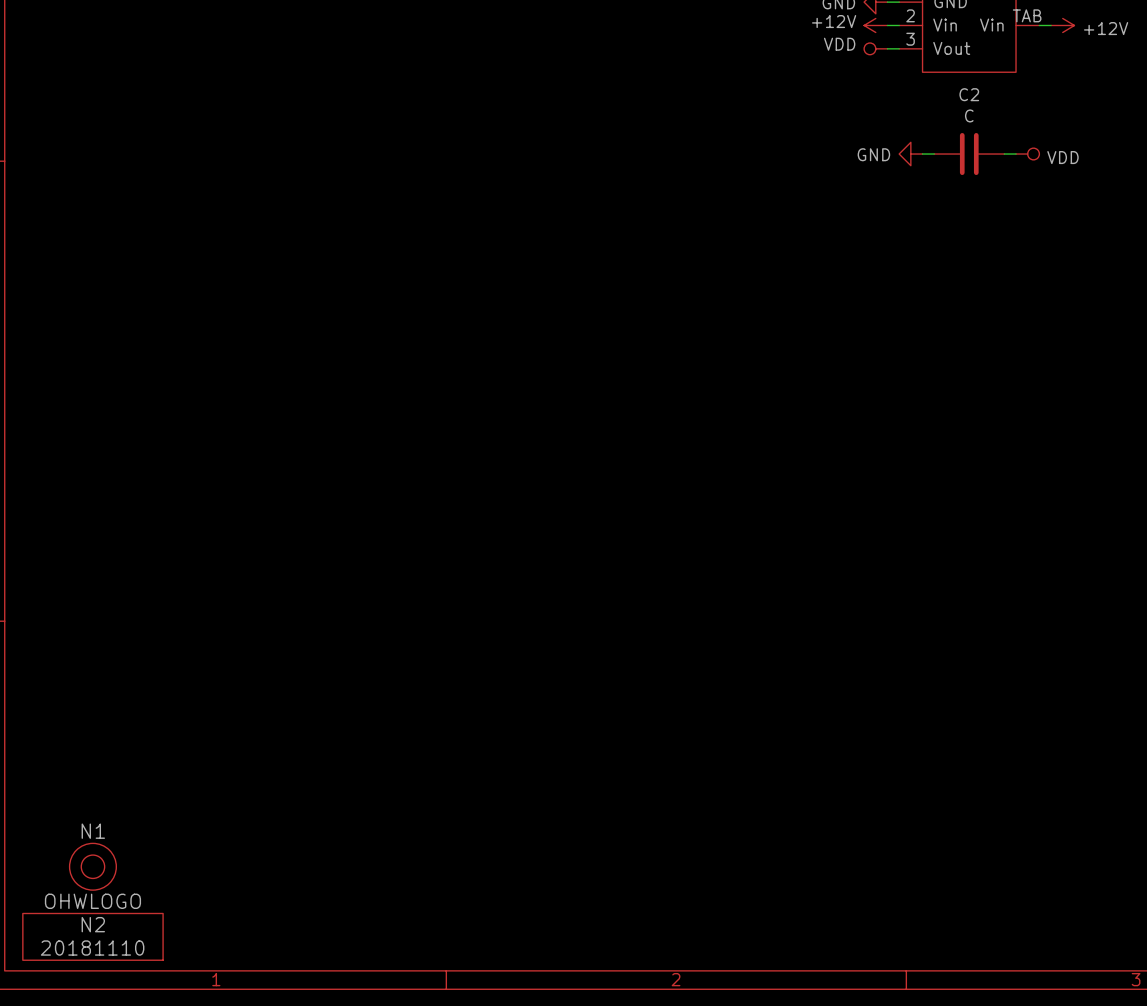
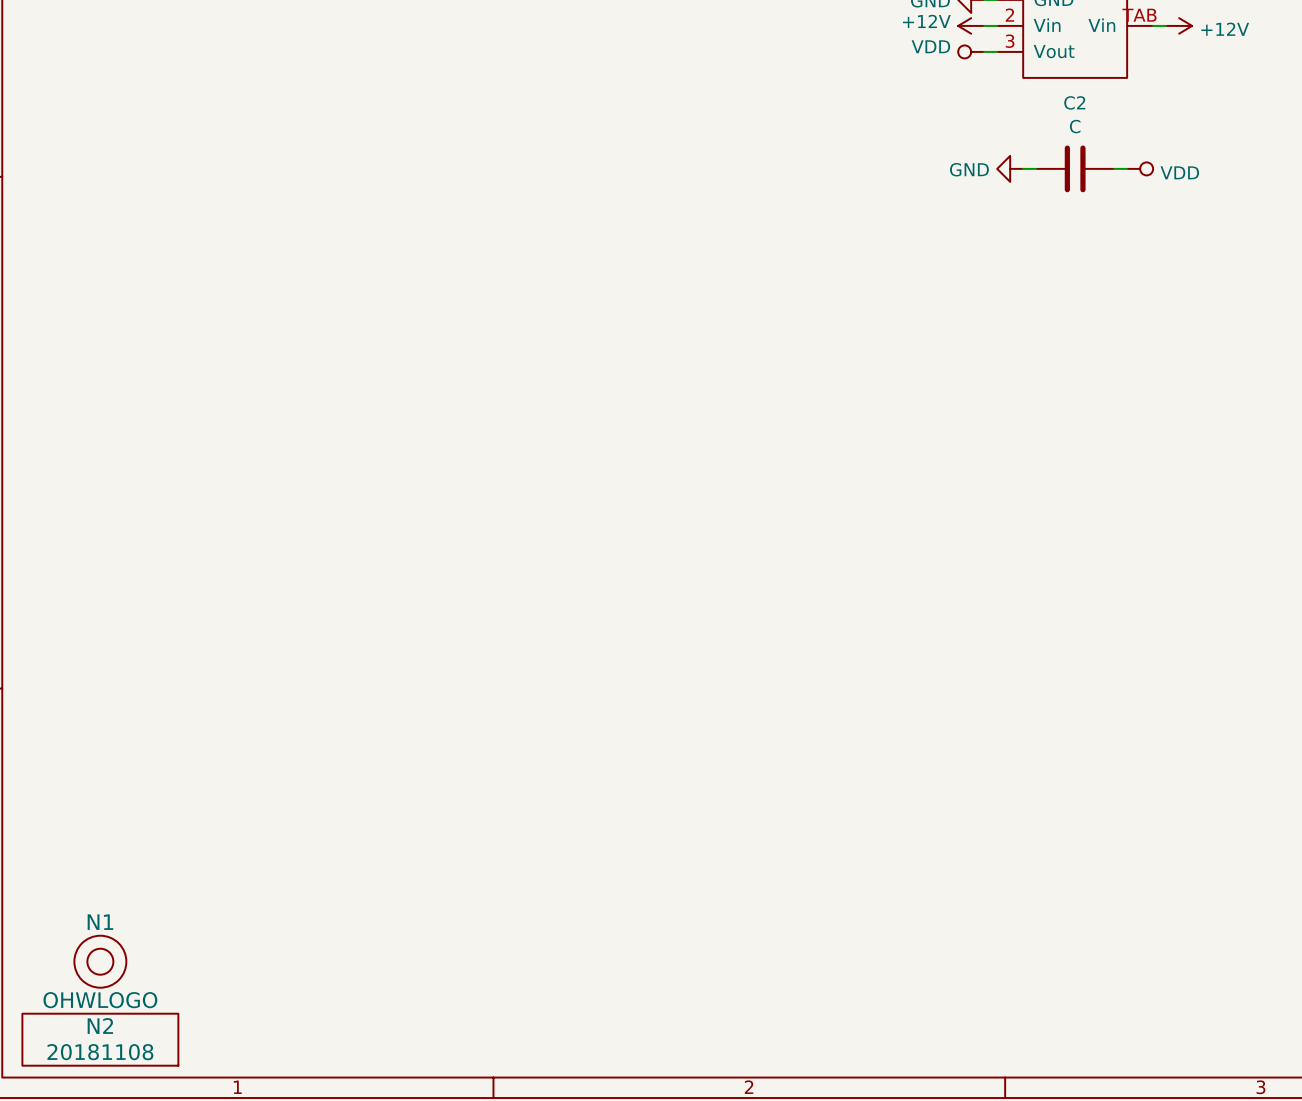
N2 value: 20181110 (92, 948) -> 20181108 (100, 1052)

